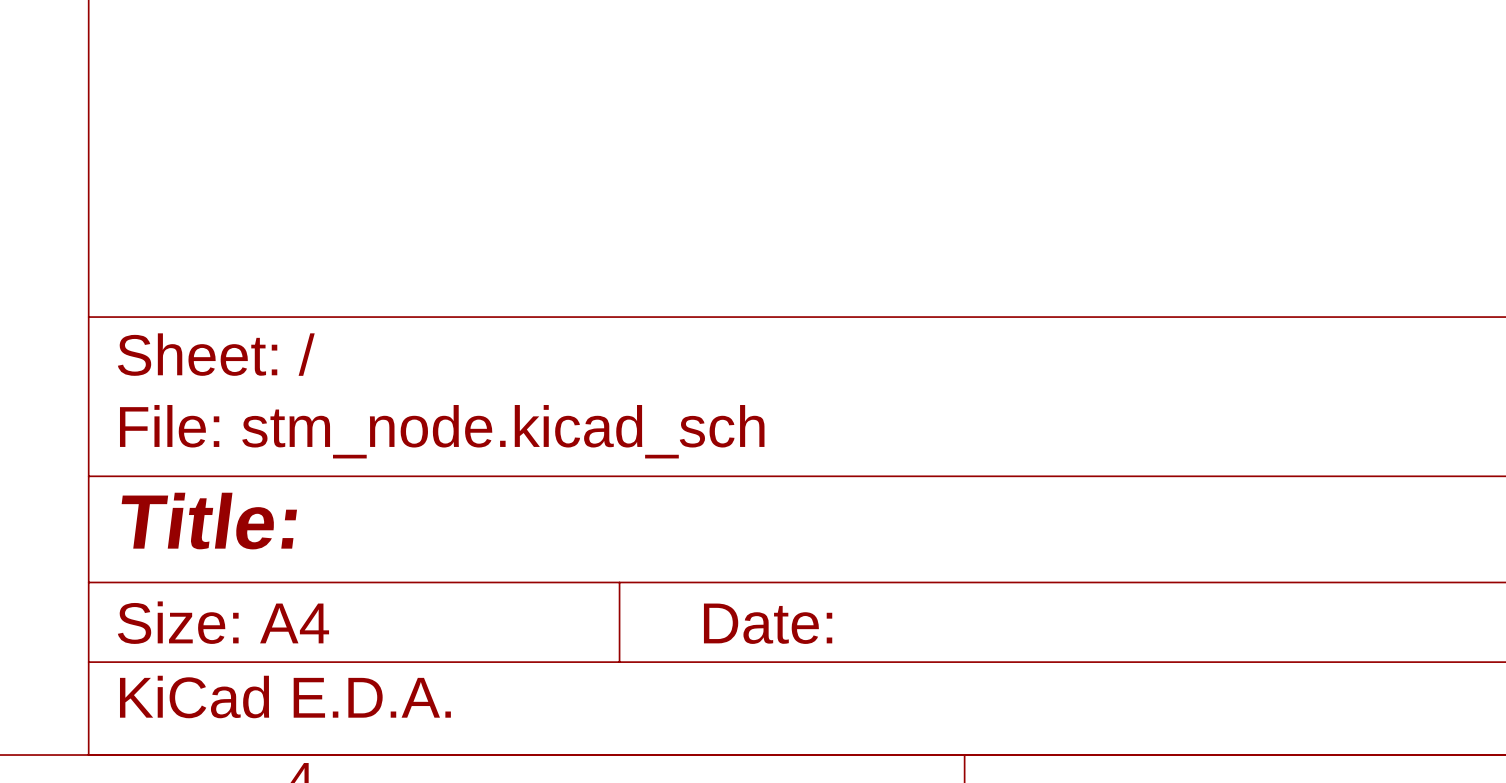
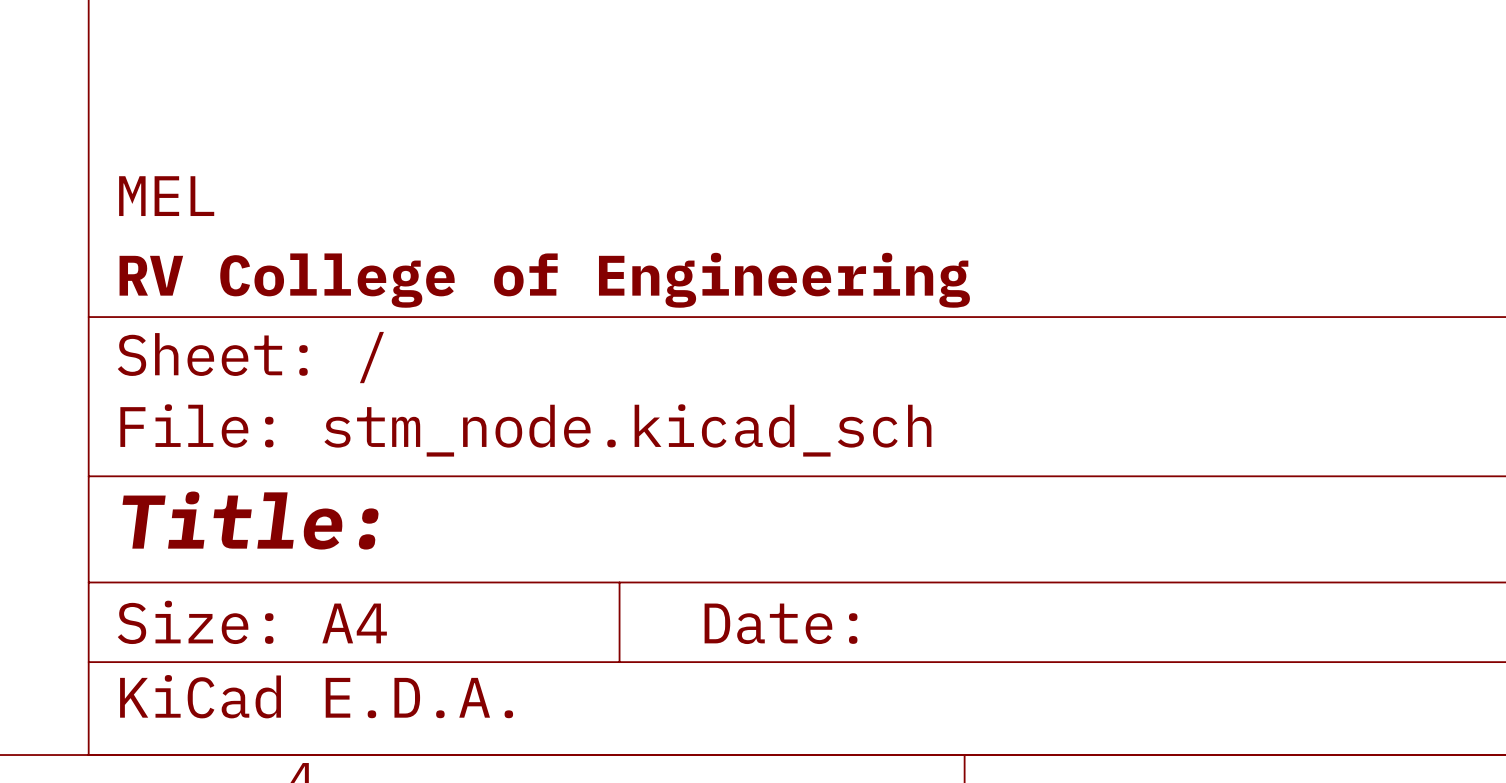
title block: none -> MEL (166, 196)
title block: none -> RV College of Engineering (544, 280)

